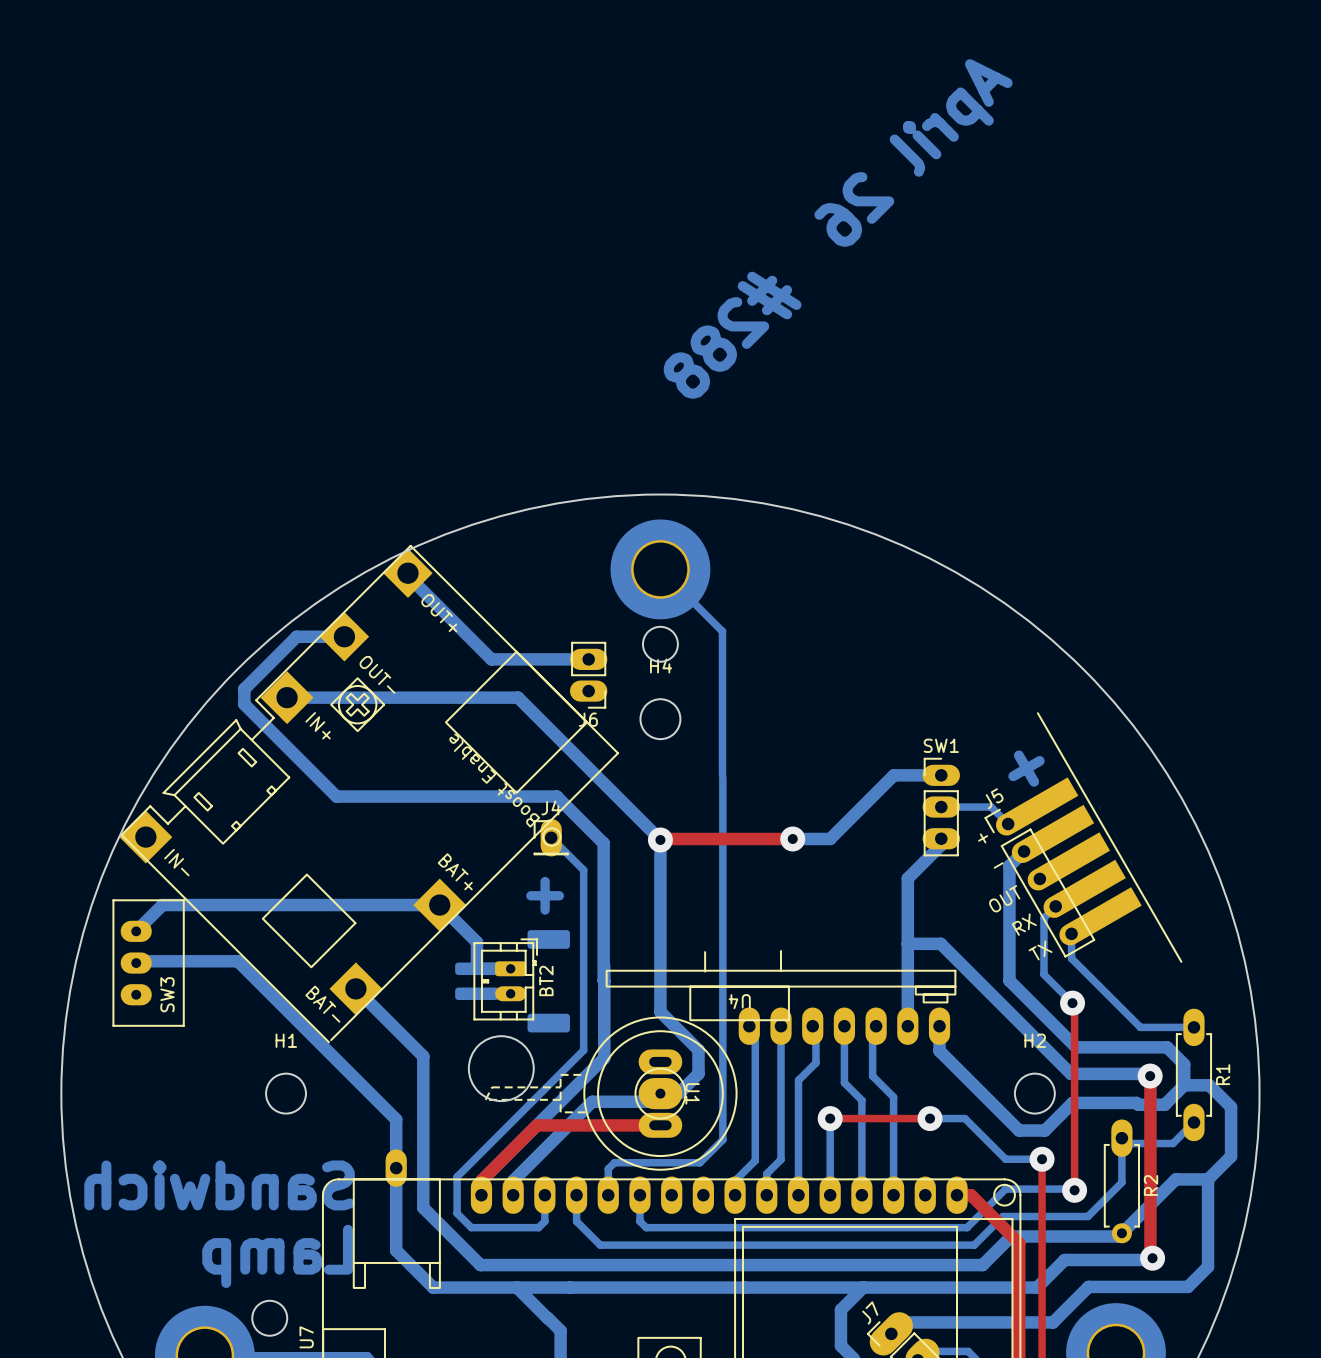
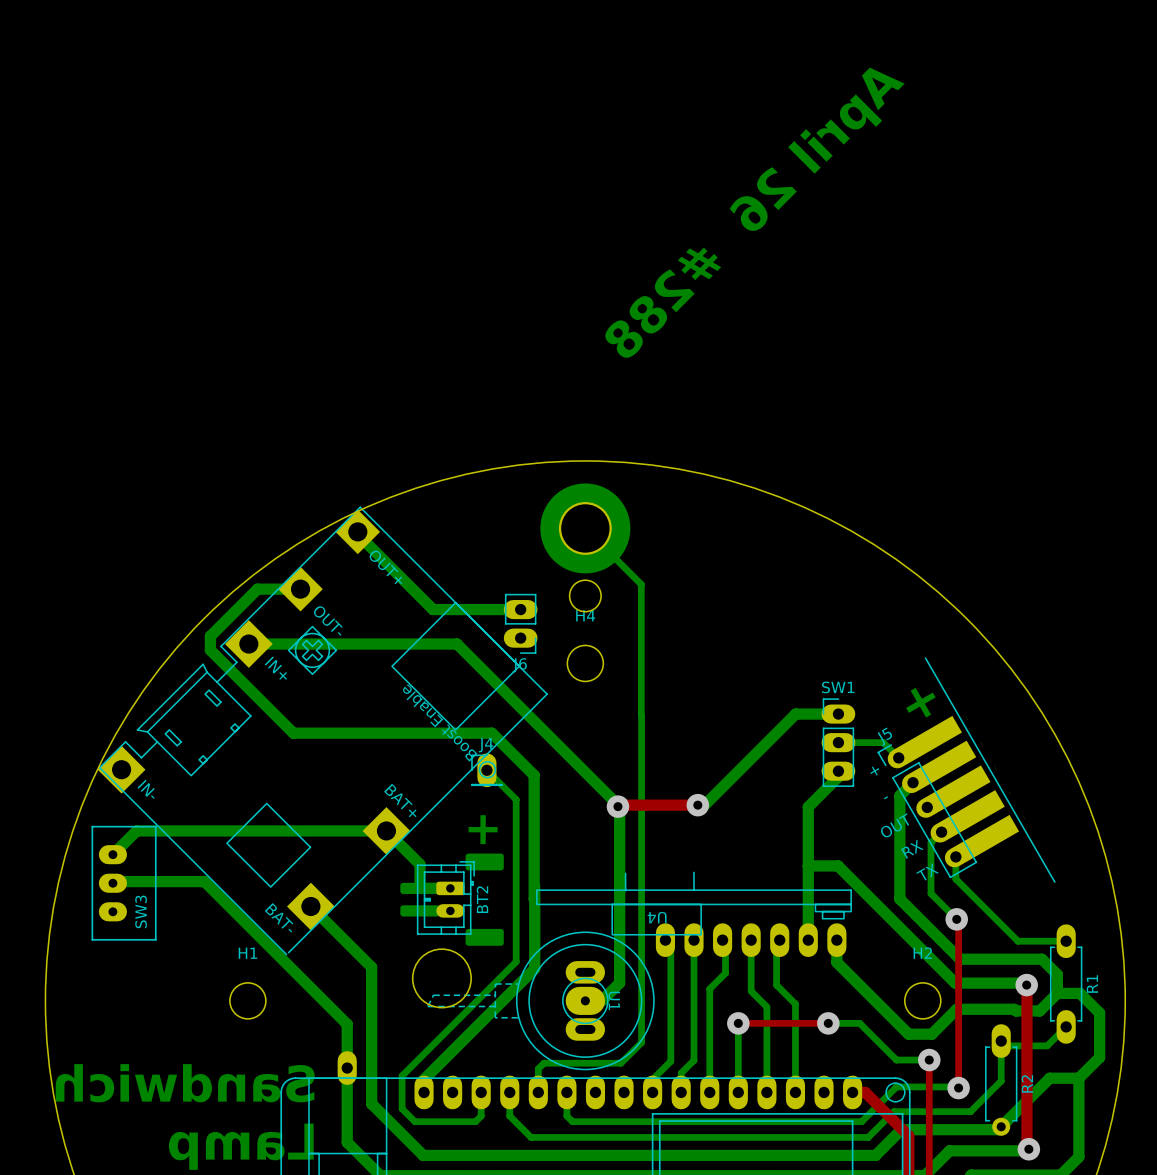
top track: (792, 838) (660, 839) -> none
bottom track: (792, 838) (830, 838) -> (697, 805) (704, 805) (738, 771)
via position: (792, 838) -> (697, 805)
bottom track: (660, 839) (660, 1011) (698, 1050) -> (585, 772) (619, 808) (619, 961)
via: (660, 839) -> none
top track: none -> (697, 805) (617, 806)
via: none -> (617, 806)
bottom track: (660, 1093) (652, 1101) (592, 1101) (513, 1180) (513, 1195) -> none
top track: (660, 1125) (536, 1125) (481, 1180) (481, 1195) -> none

